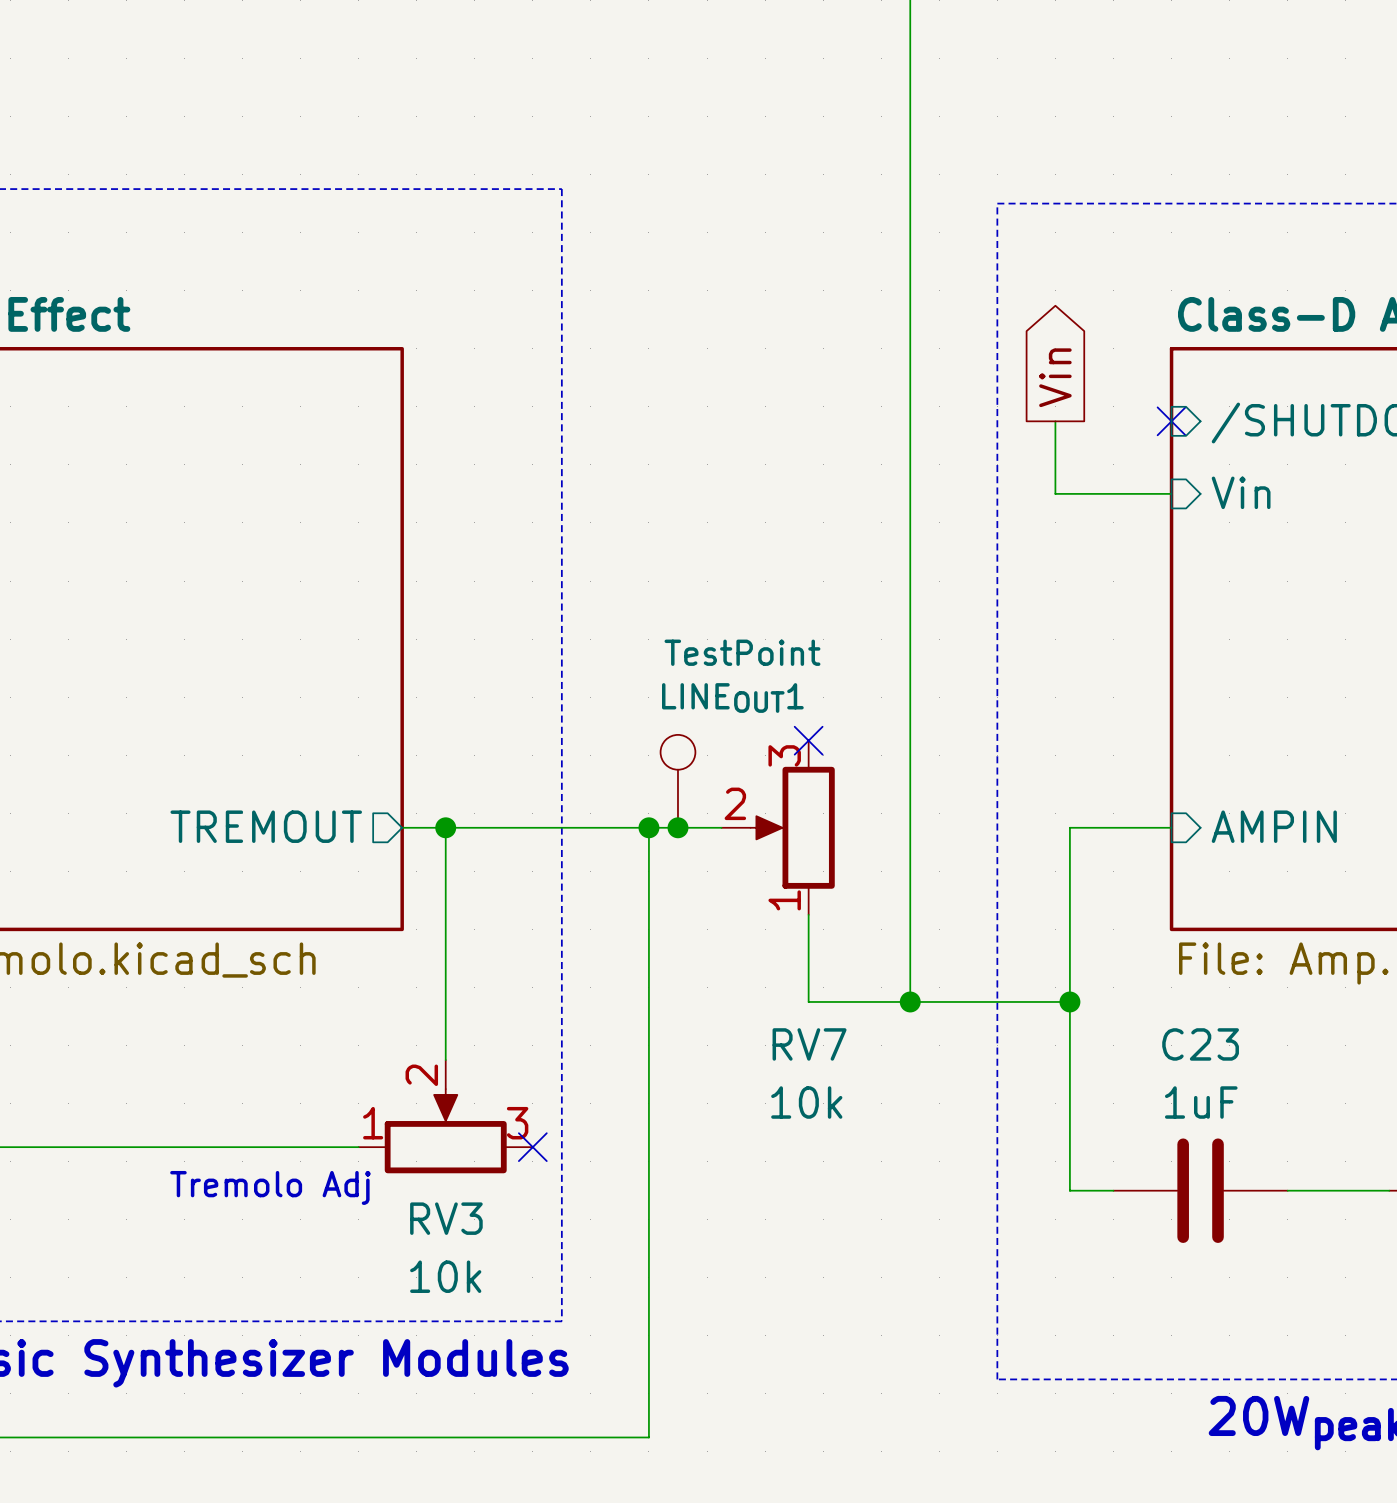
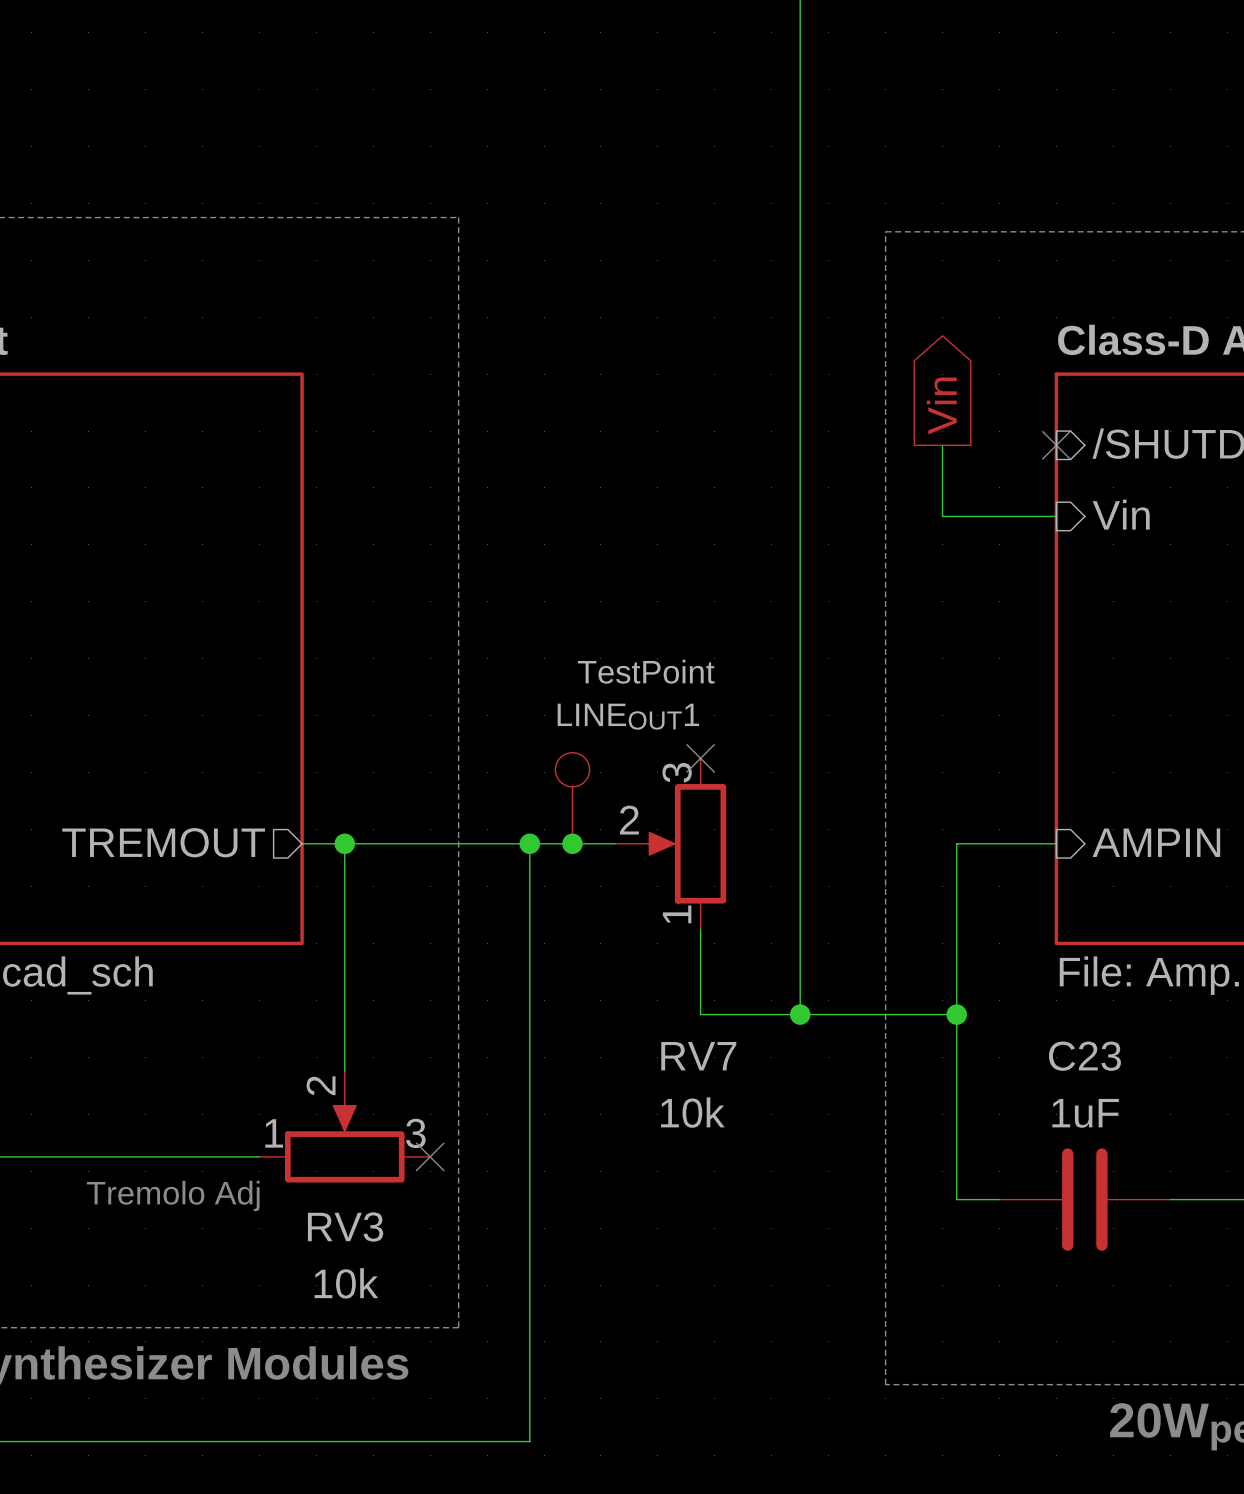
wire: (648, 827) (648, 1437) (634, 1437) -> (529, 843) (529, 1441)
junction position: (648, 827) -> (529, 843)

